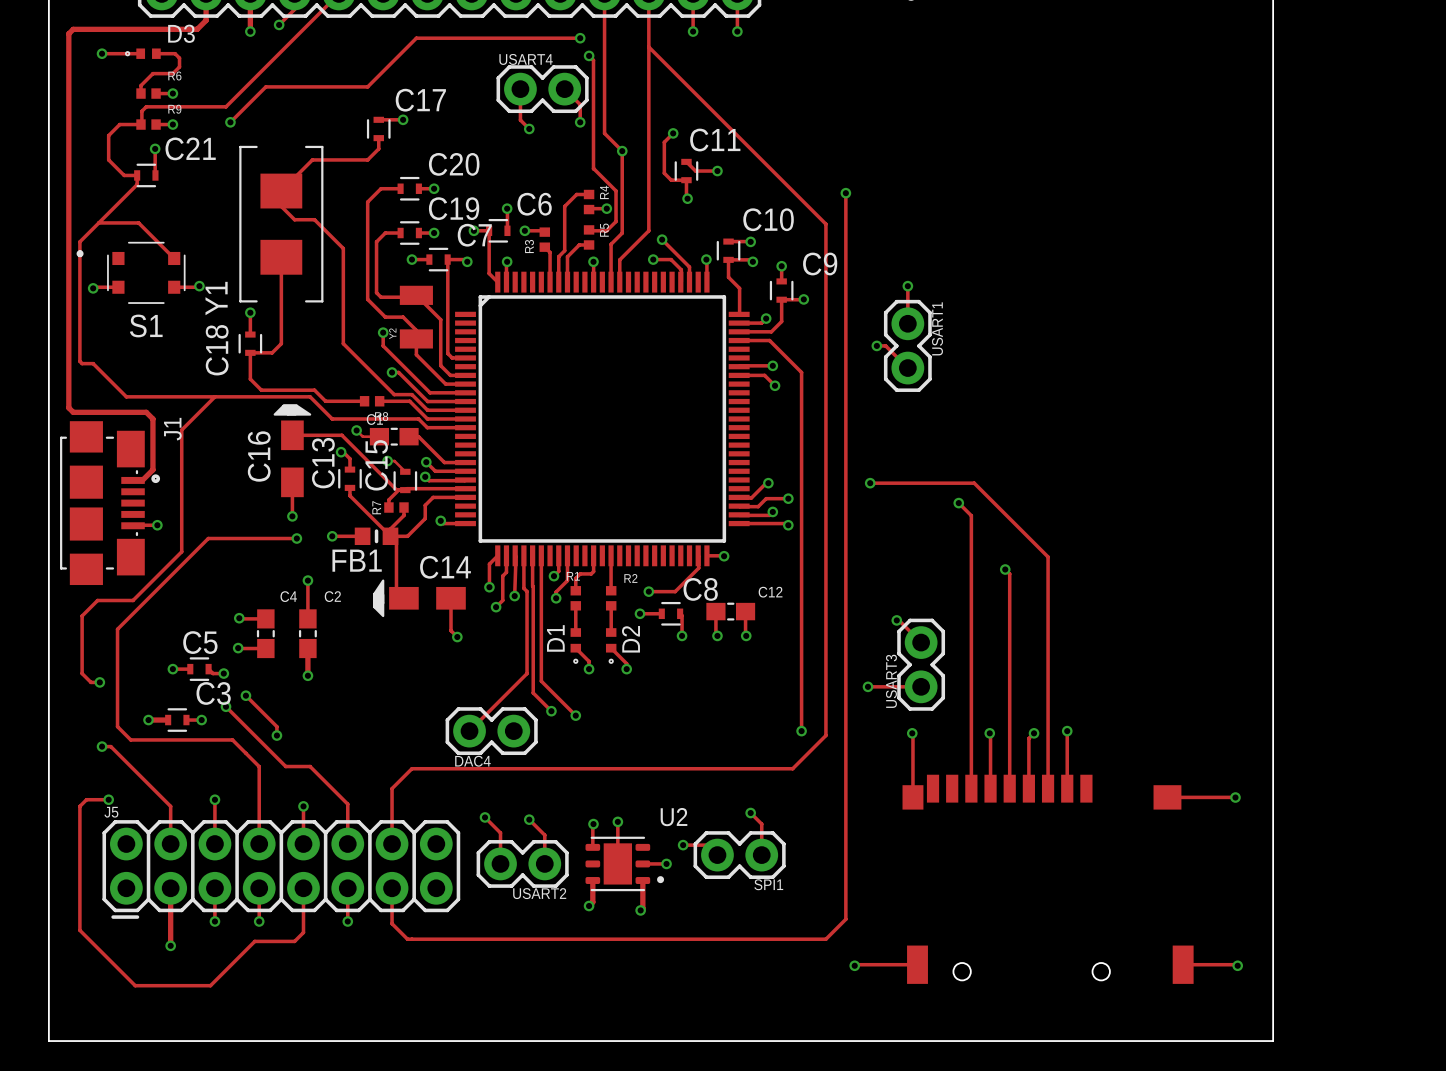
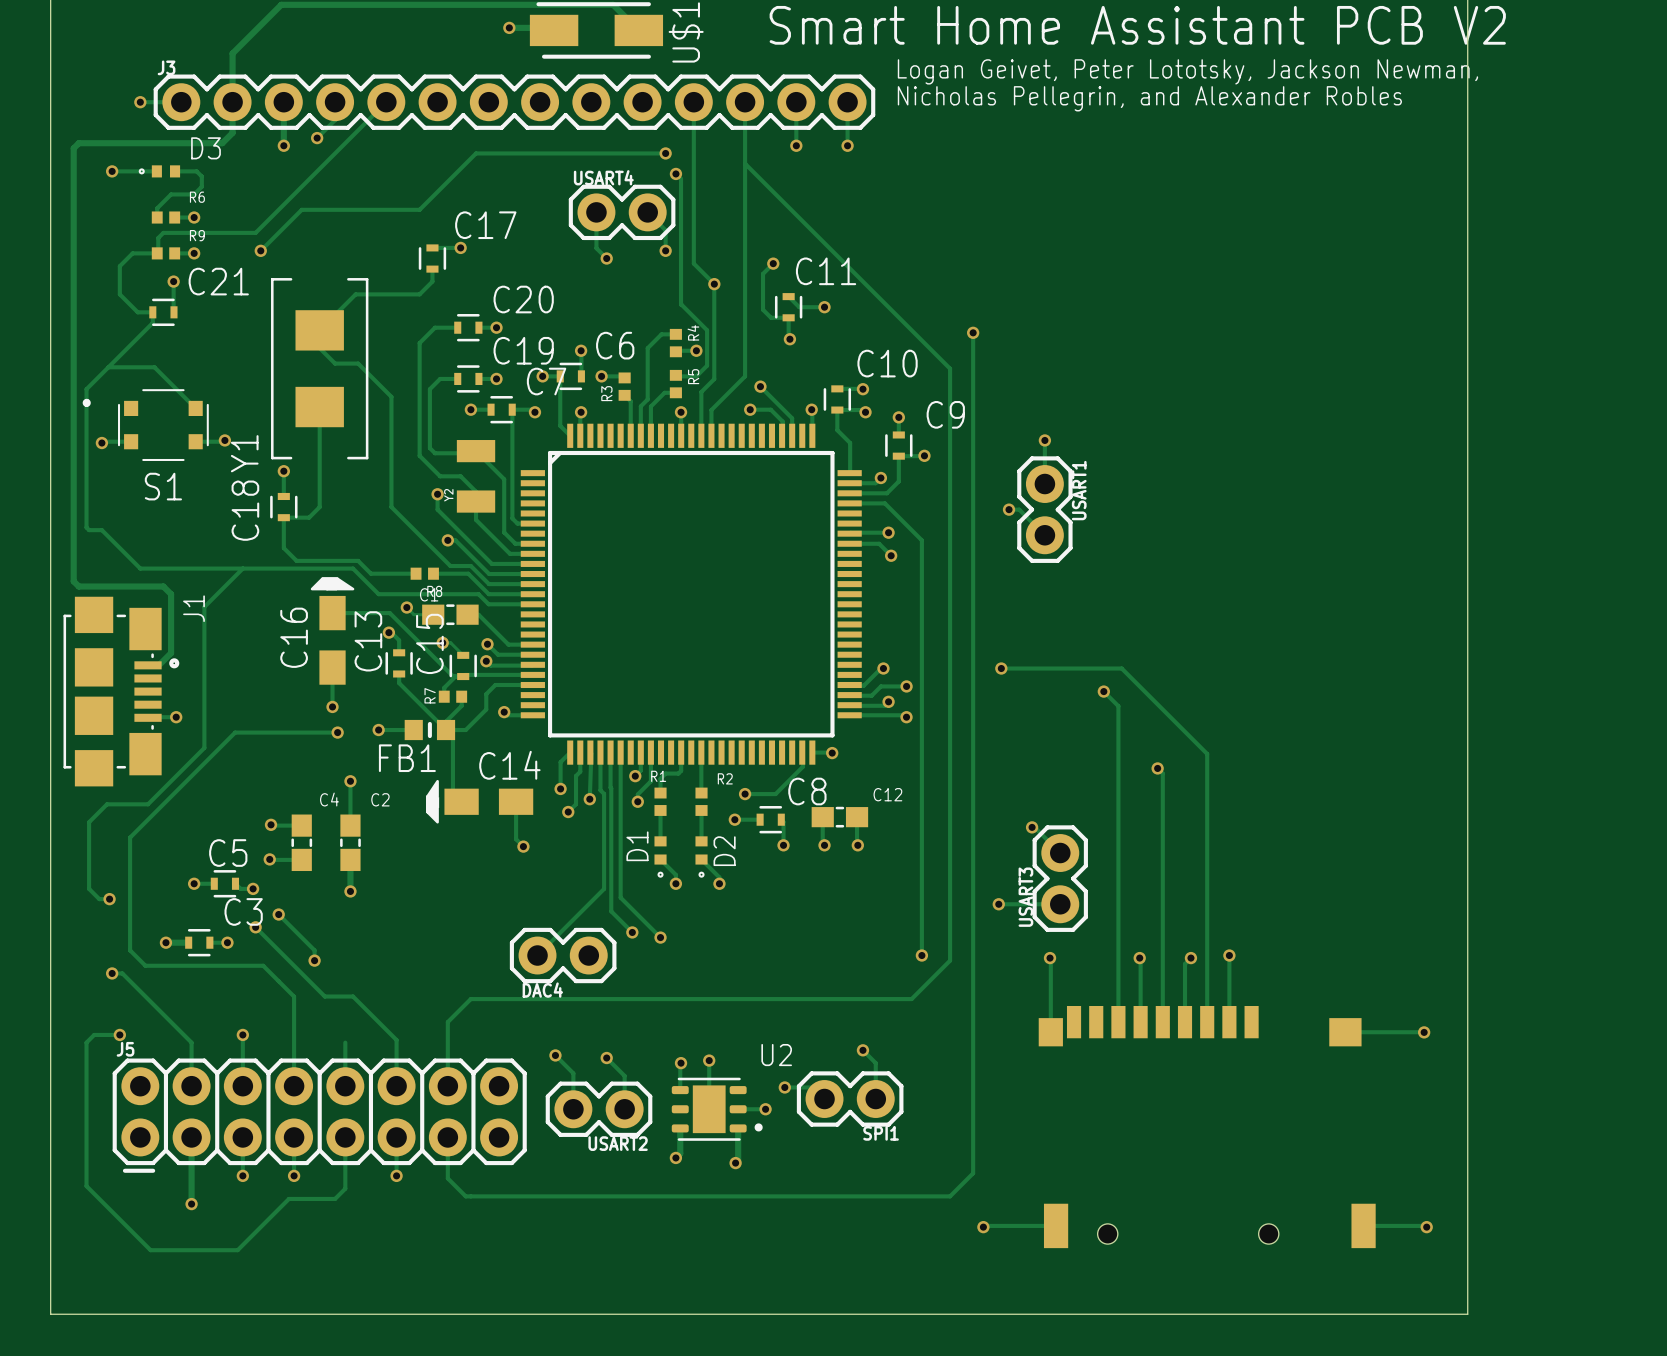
via: (303, 806) -> none

